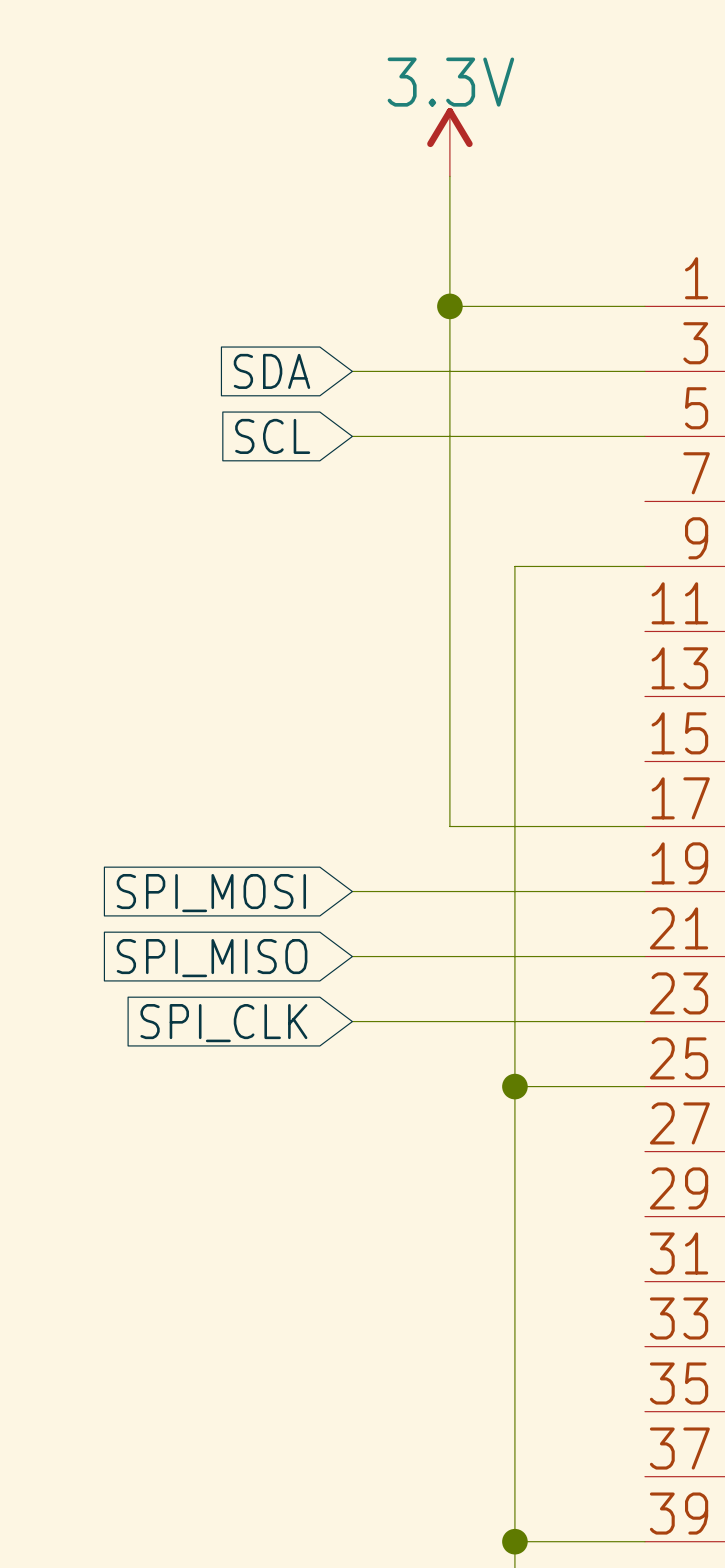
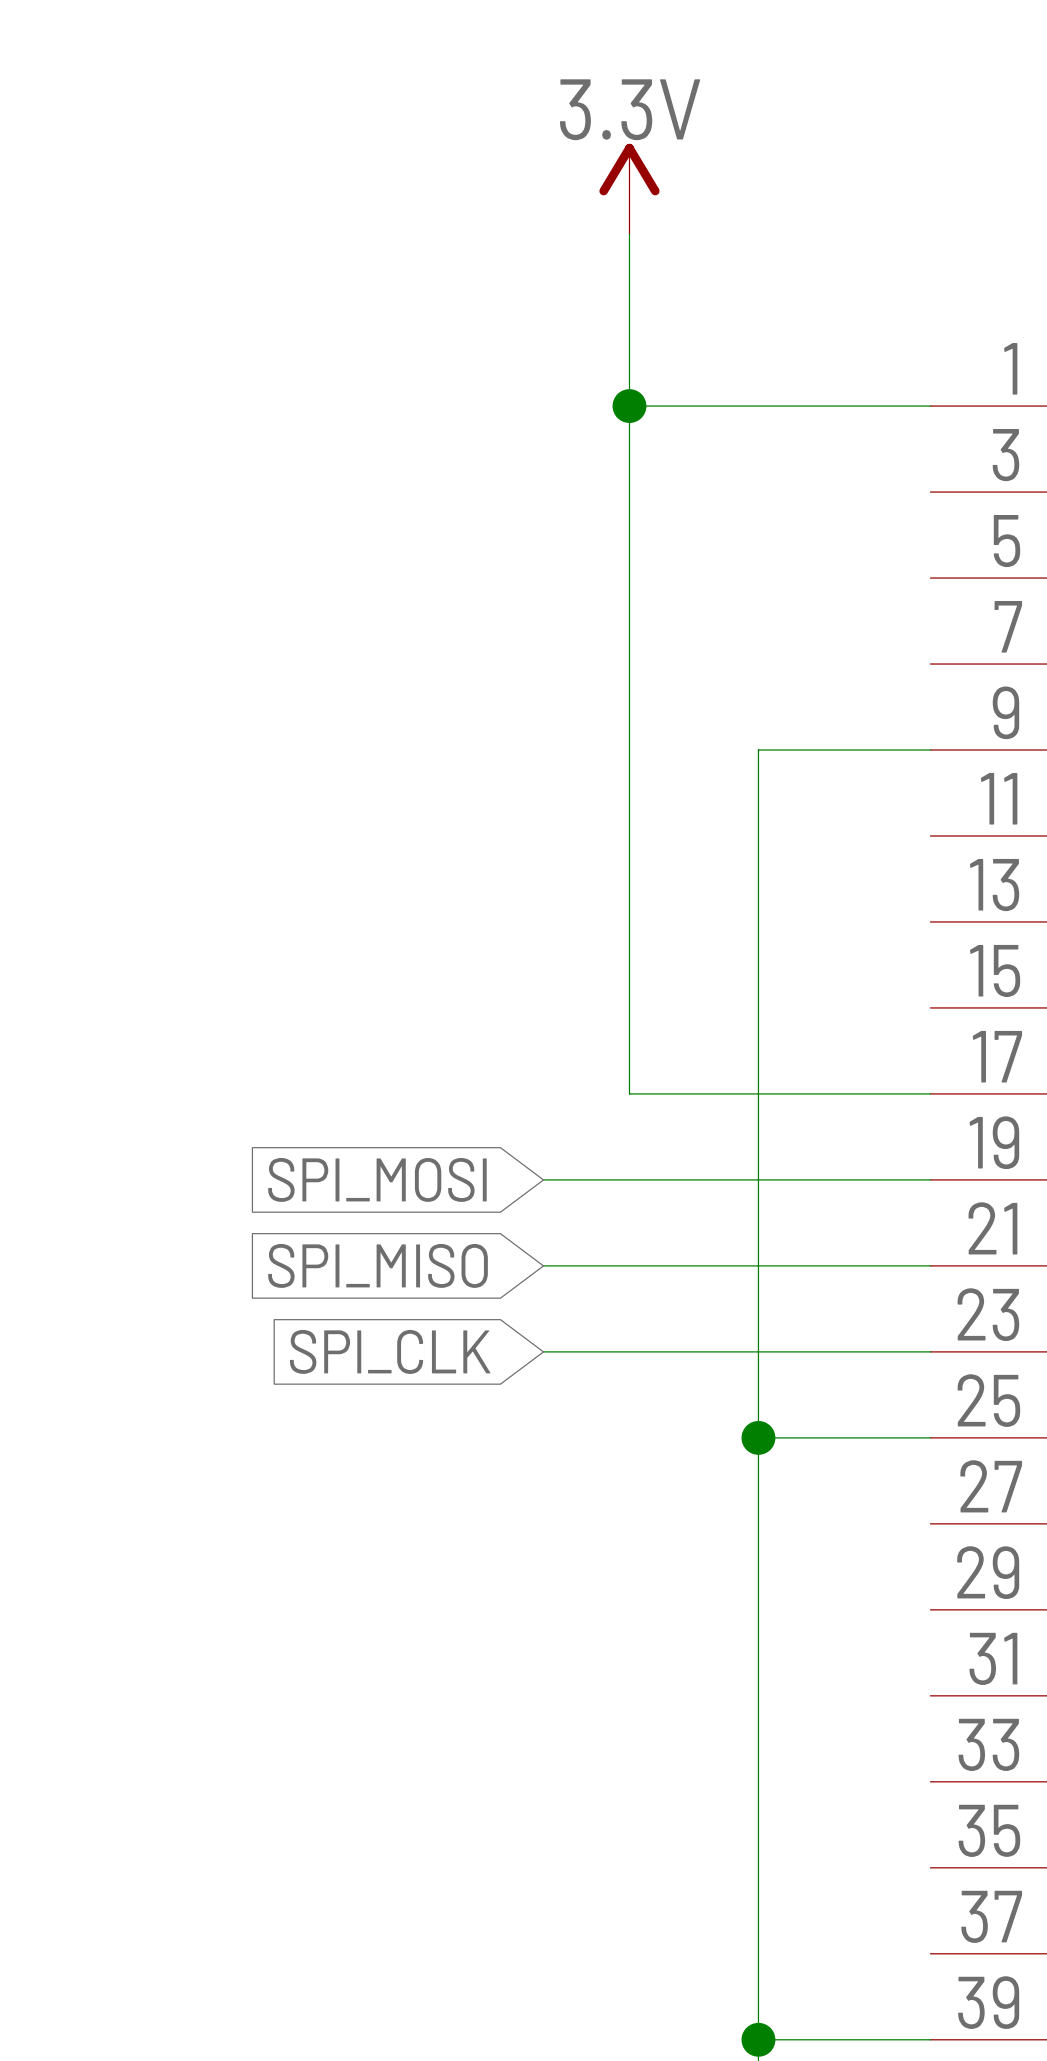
power symbol position: 3.3V (449, 142) -> 3.3V (629, 188)
wire: (449, 176) (449, 826) -> (629, 234) (629, 1093) (672, 1093)
wire: none -> (629, 406) (672, 406)
junction position: (449, 306) -> (629, 406)
global label: SDA (271, 371) -> none
wire: (352, 371) (644, 371) -> none
global label: SCL (272, 436) -> none
wire: (352, 436) (644, 436) -> none

